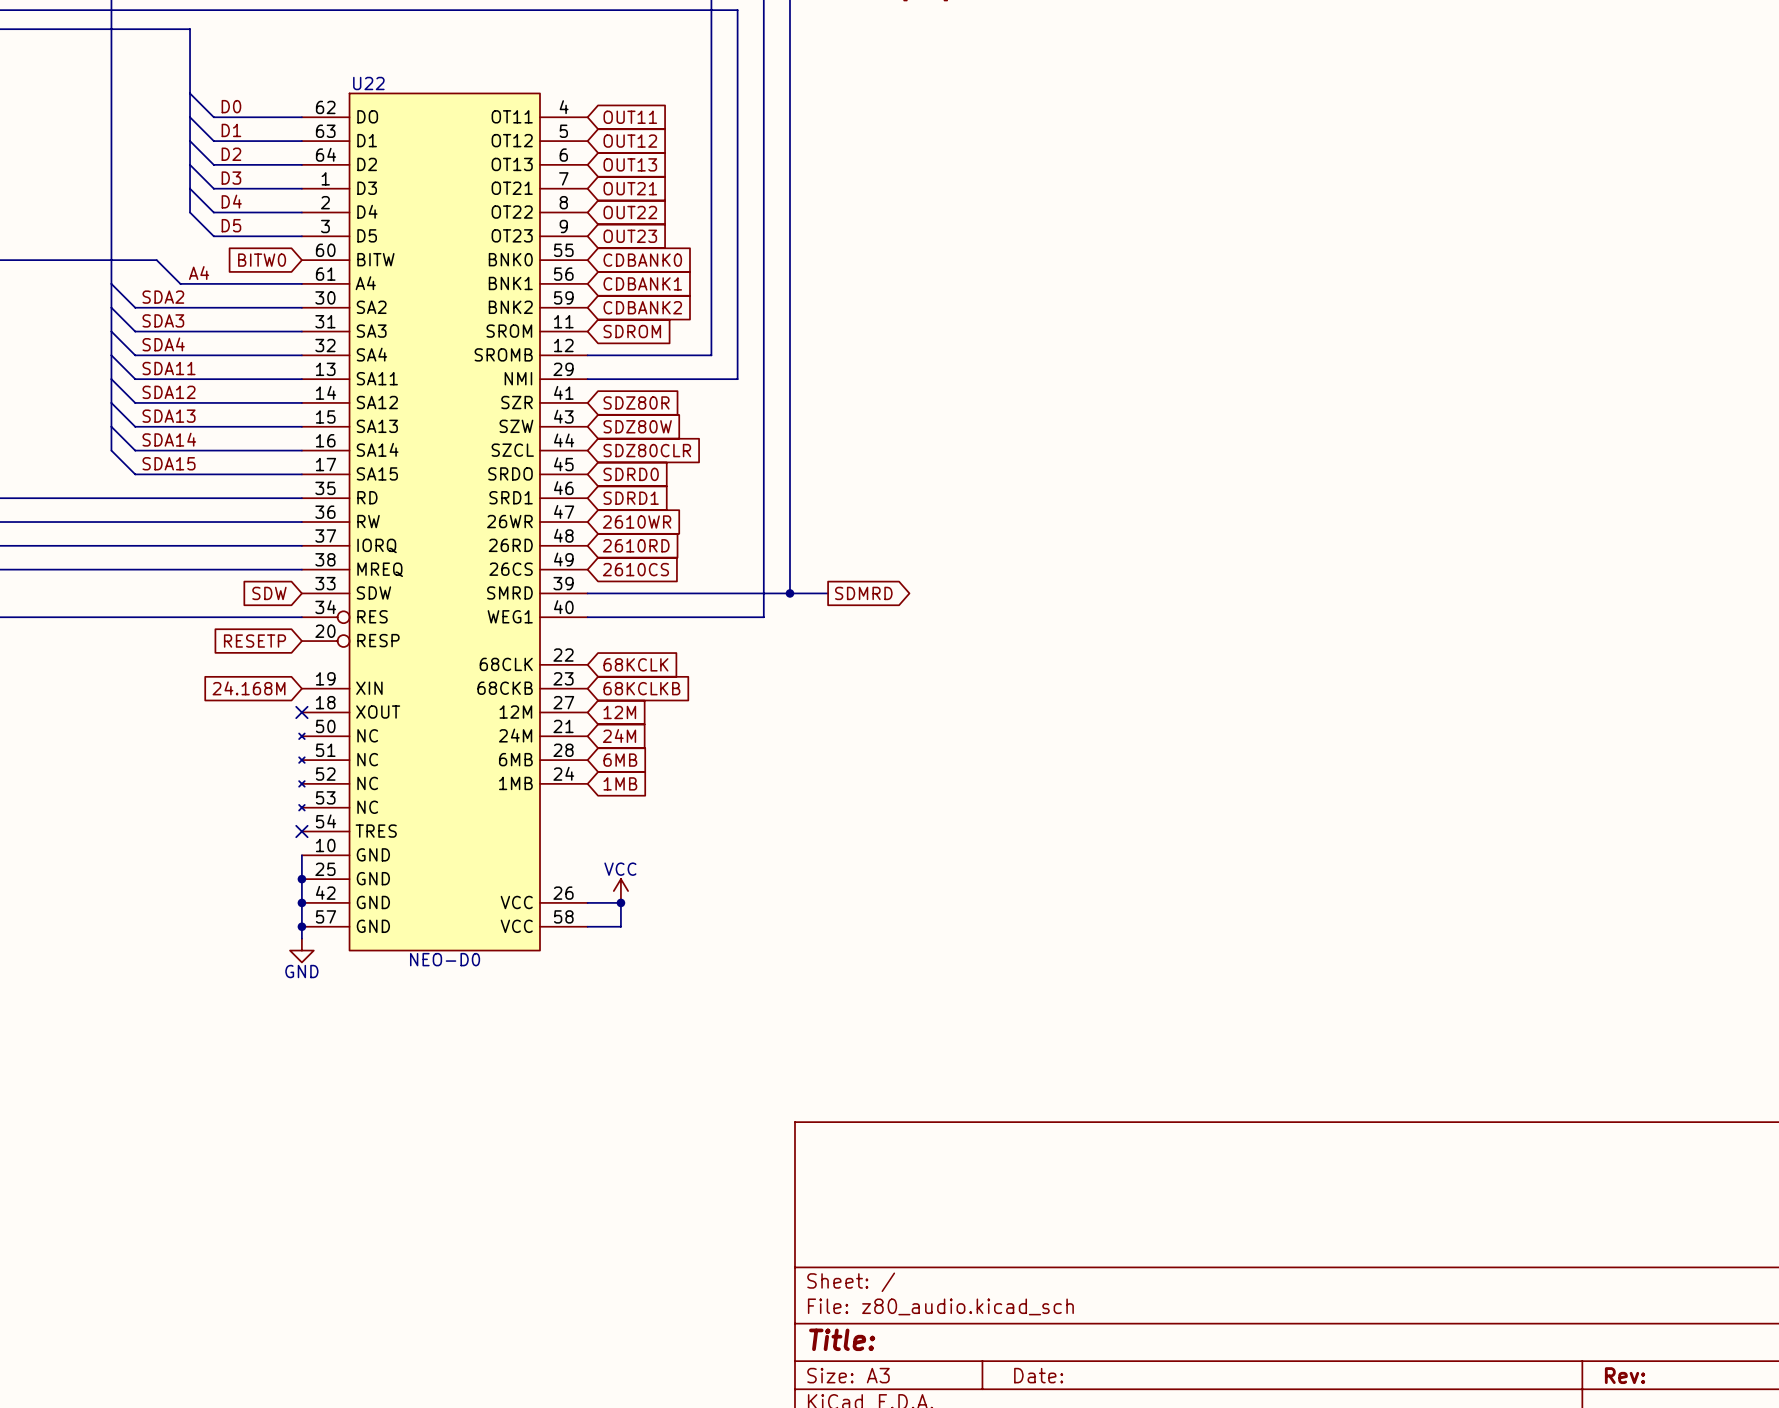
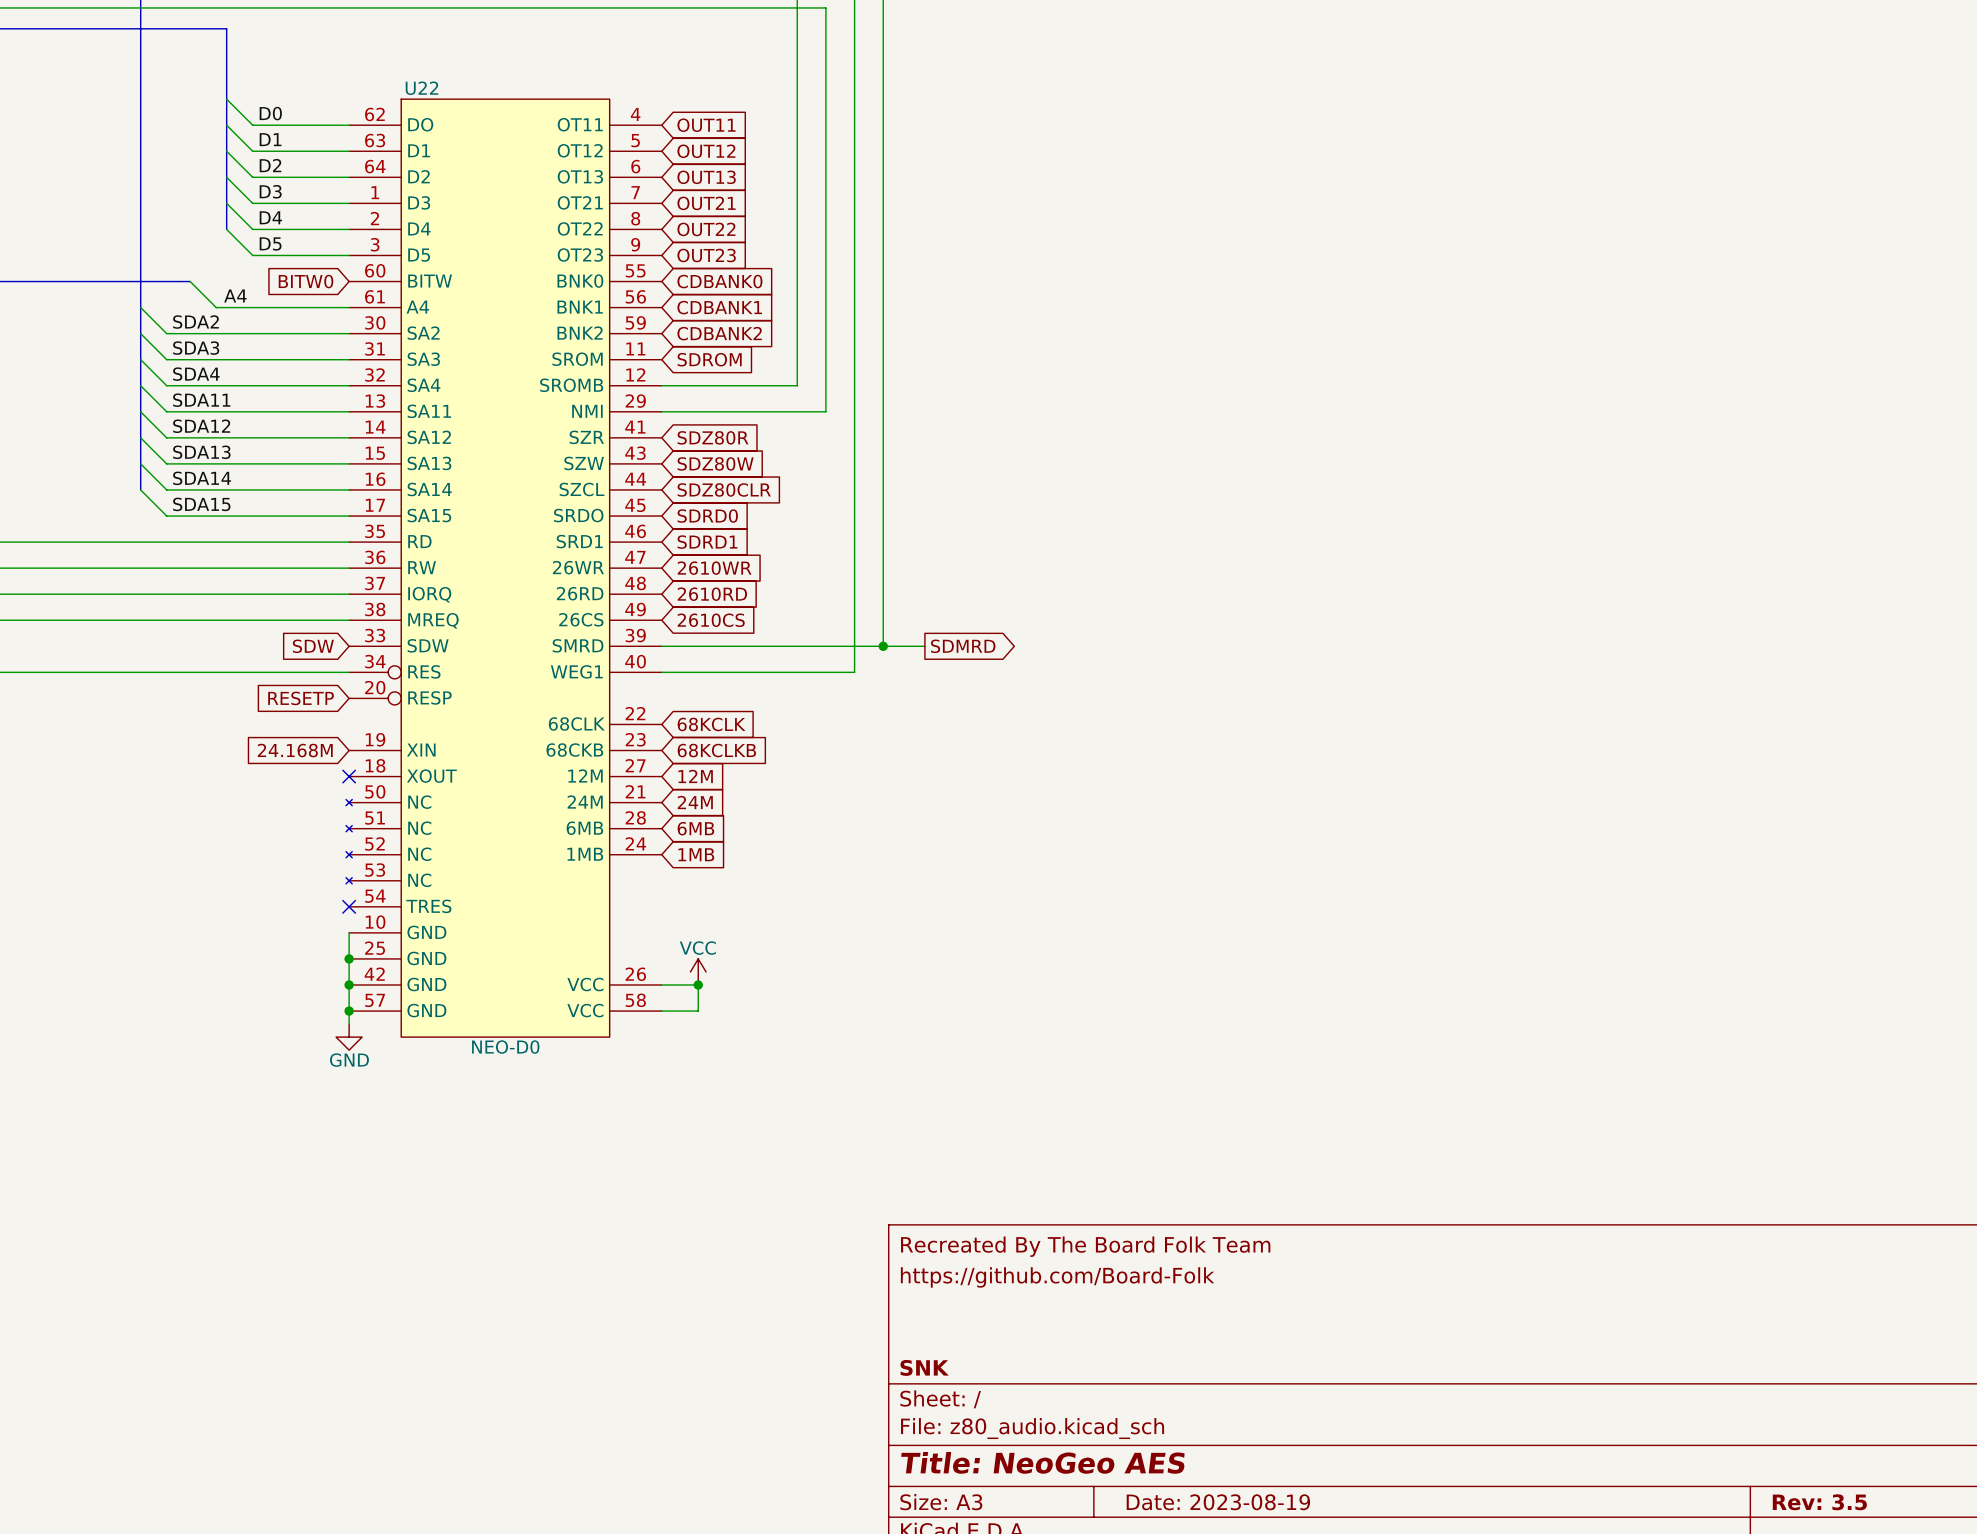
title block: none -> Recreated By The Board Folk Team (1085, 1246)
title block: none -> https://github.com/Board-Folk (1057, 1277)
title block: none -> SNK (924, 1367)
title block: Title: (842, 1339) -> Title: NeoGeo AES (1042, 1462)
title block: Date: (1038, 1375) -> Date: 2023-08-19 (1218, 1502)
title block: Rev: (1625, 1375) -> Rev: 3.5 (1819, 1502)

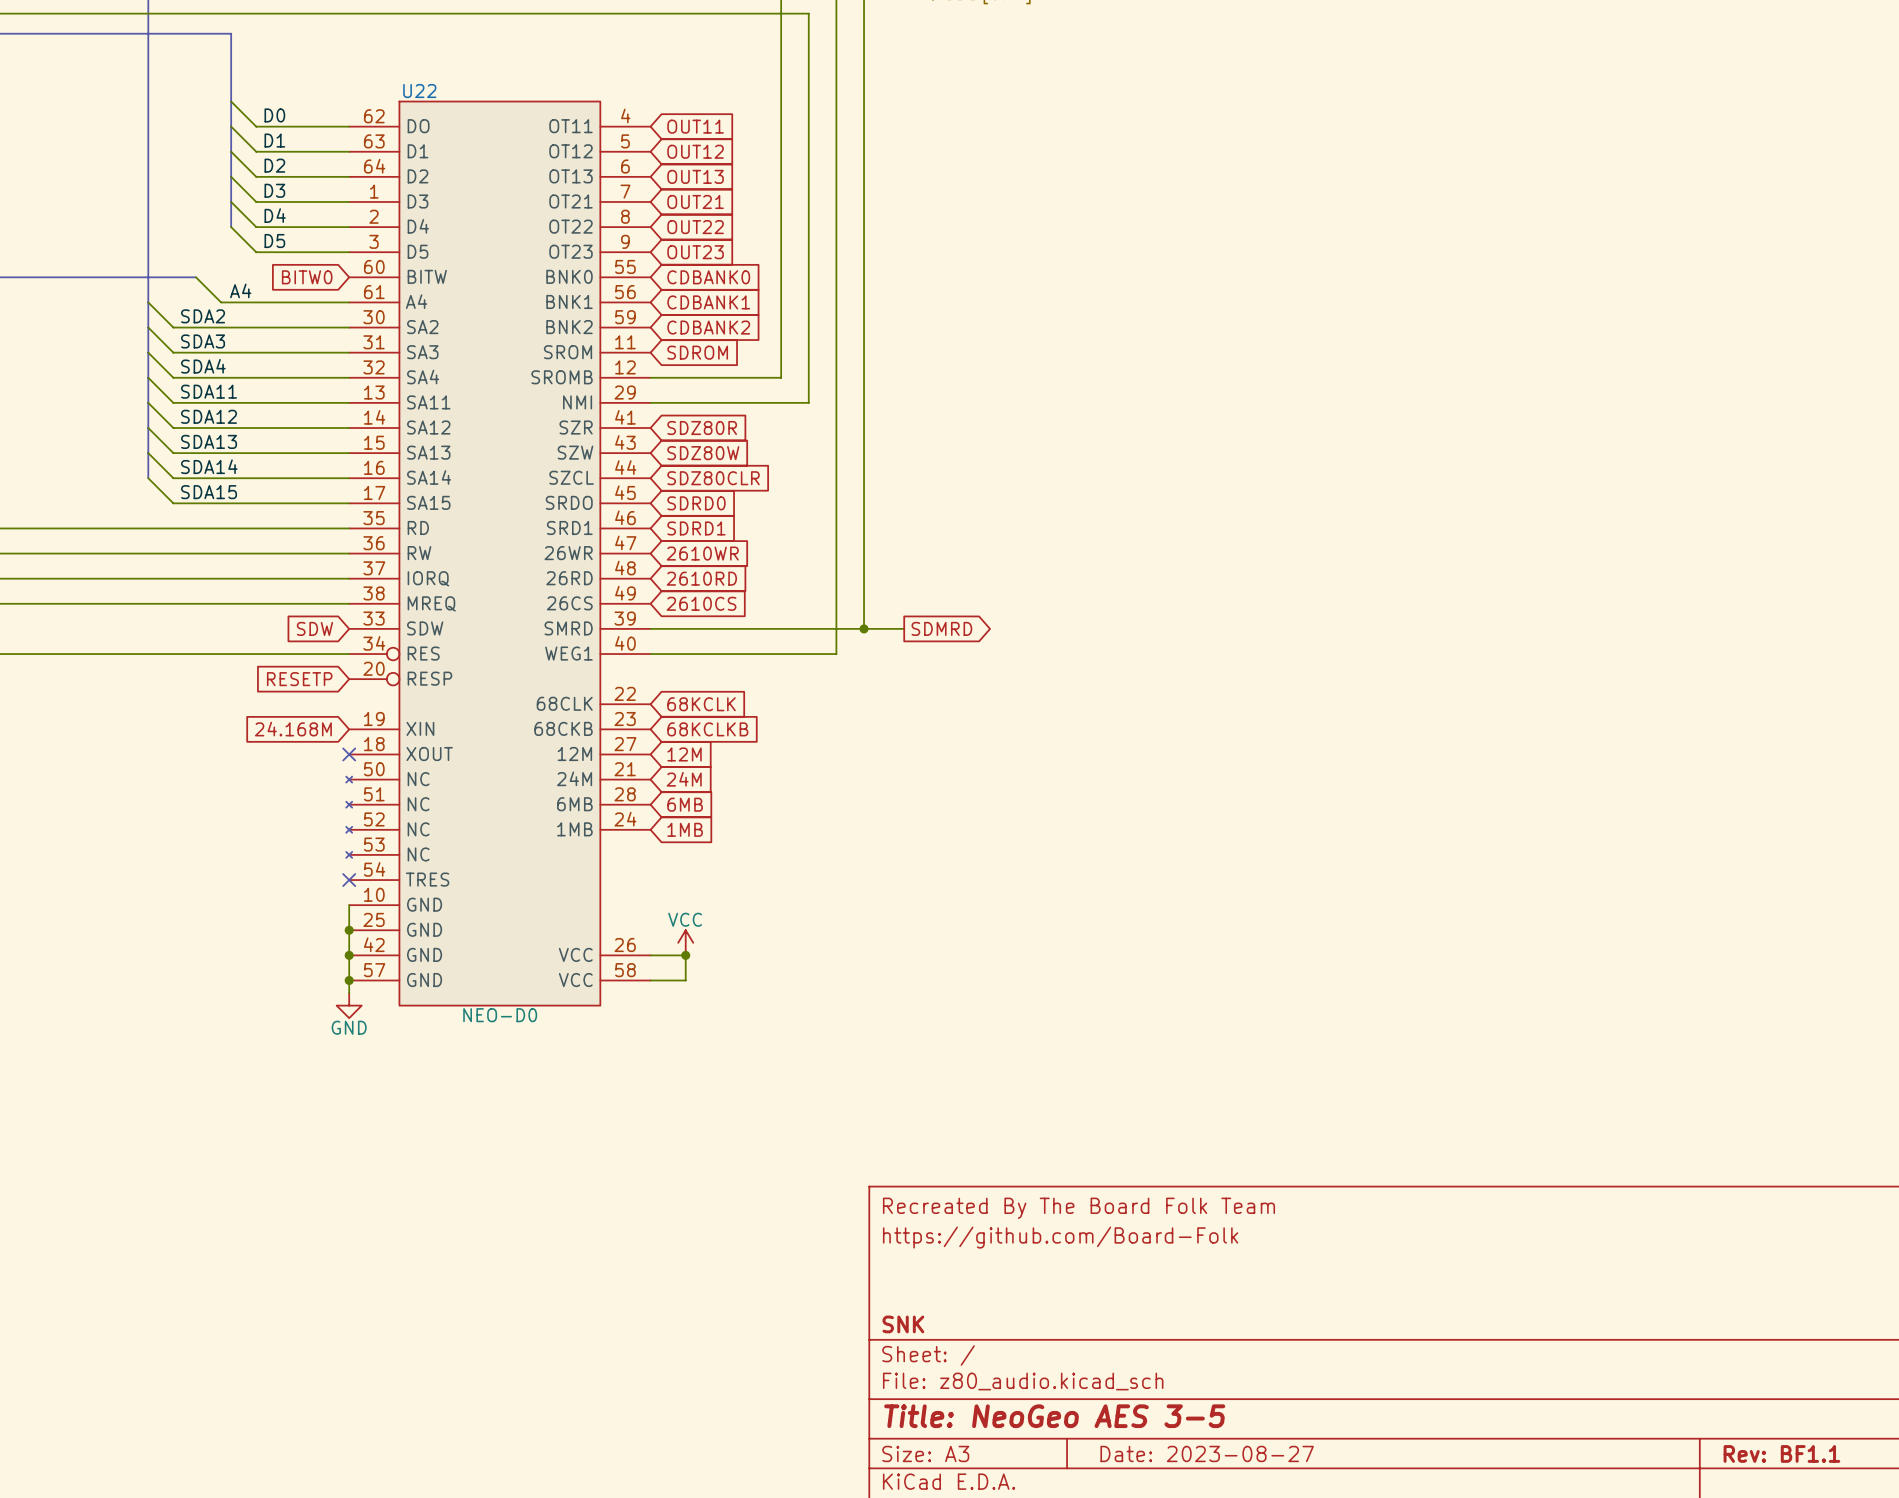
title block: Title: NeoGeo AES (1042, 1462) -> Title: NeoGeo AES 3-5 (1054, 1416)
title block: Date: 2023-08-19 (1218, 1502) -> Date: 2023-08-27 (1207, 1453)
title block: Rev: 3.5 (1819, 1502) -> Rev: BF1.1 (1781, 1453)

